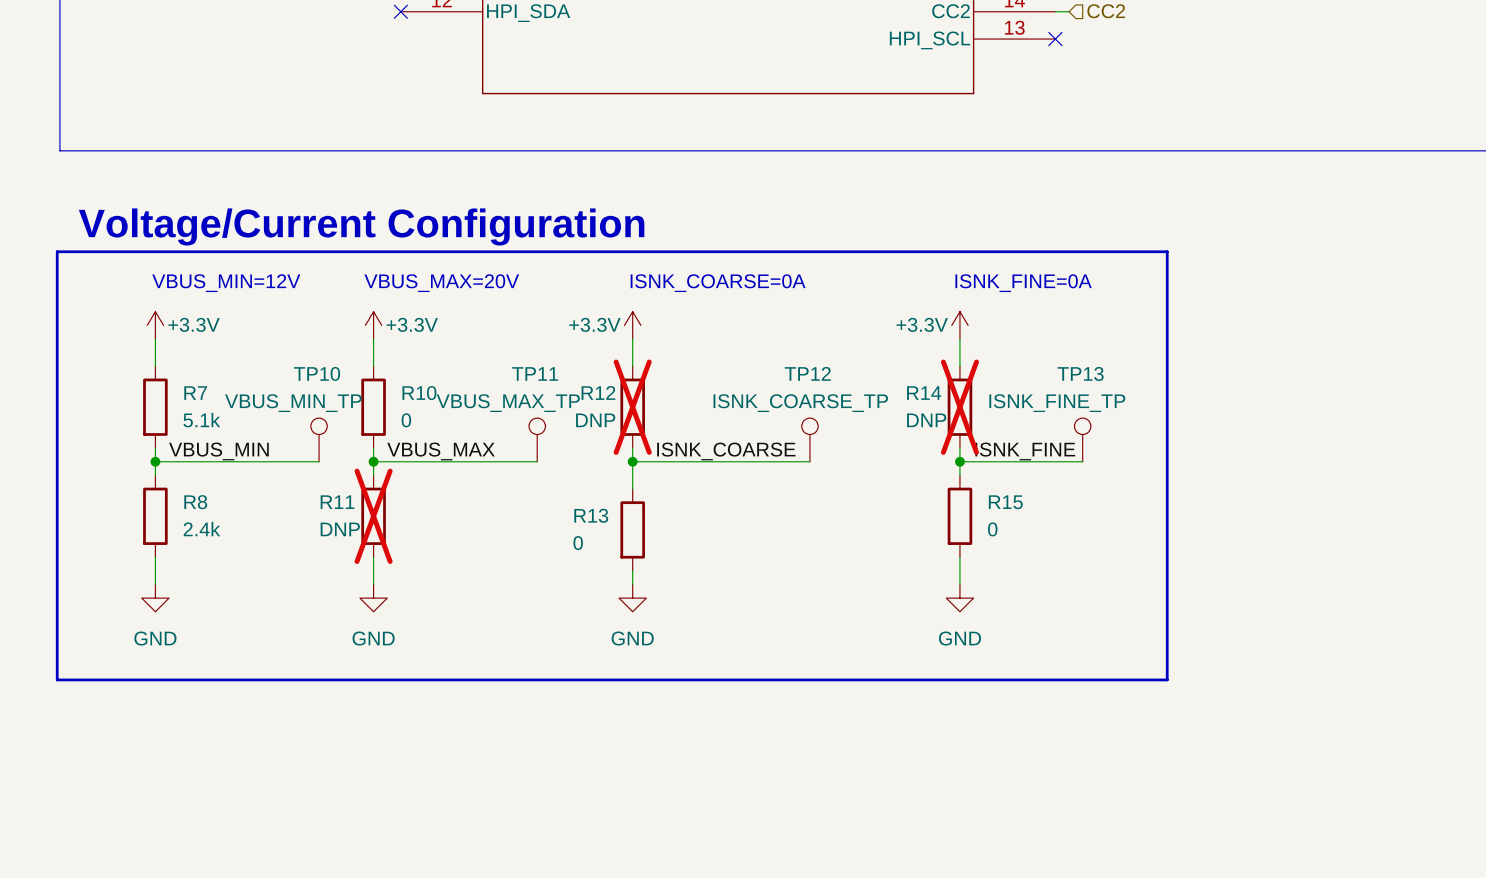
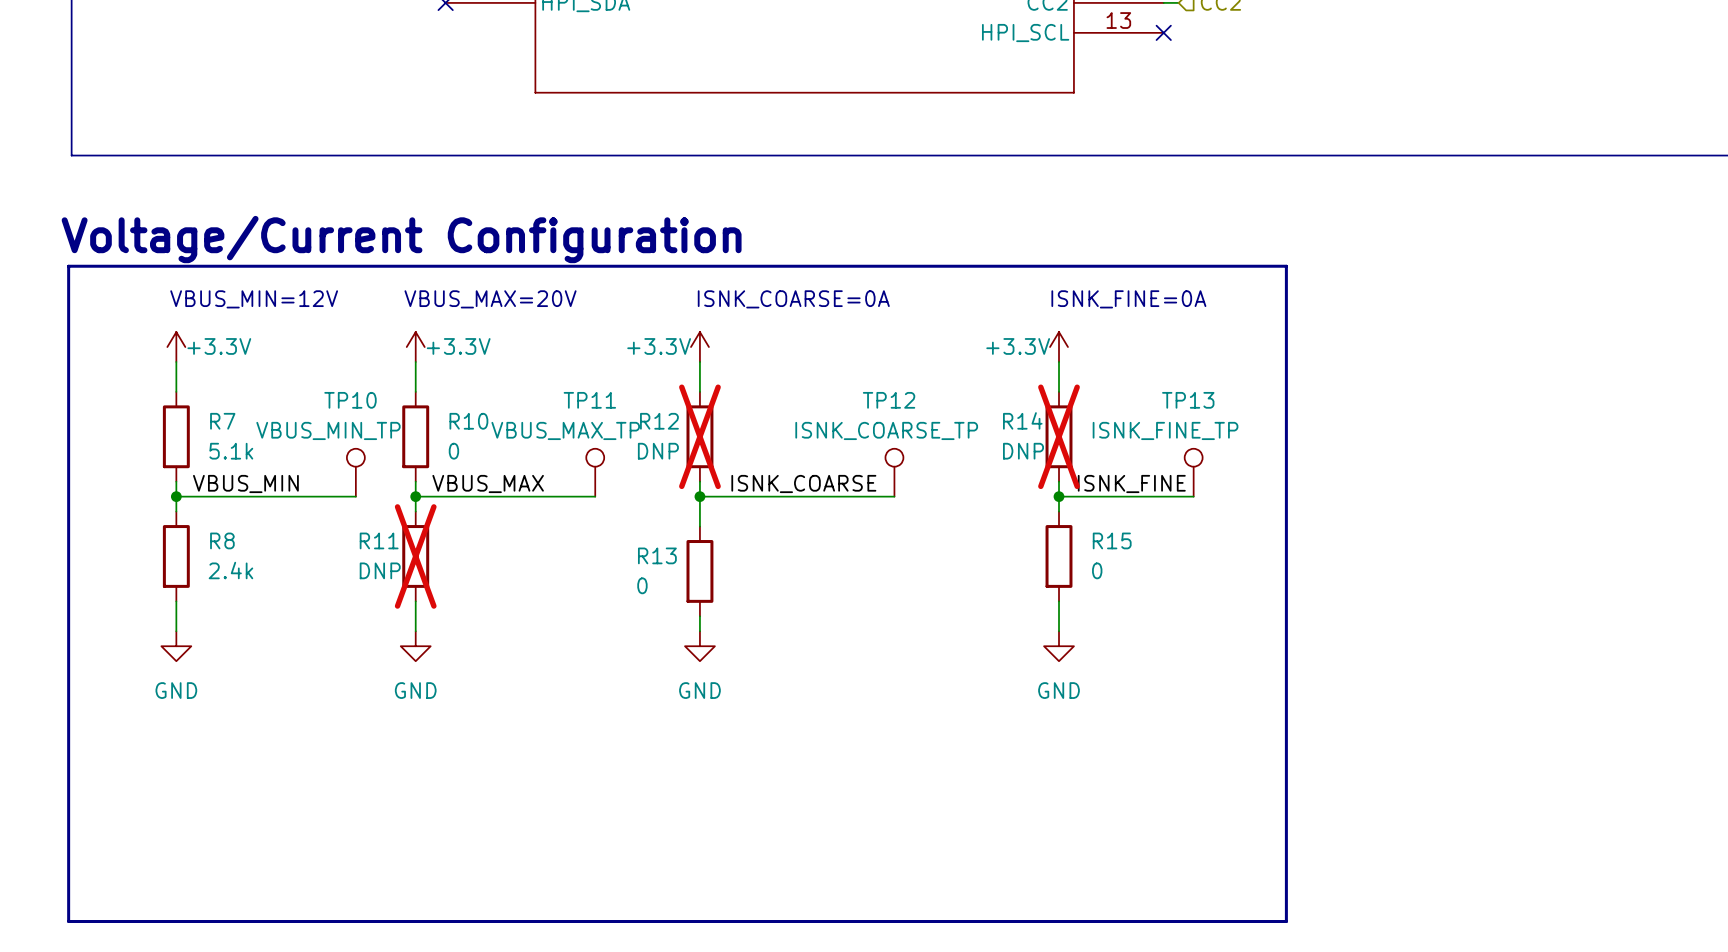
line: (57, 679) (1167, 679) -> (68, 735) (68, 921) (1286, 921) (1286, 735)

